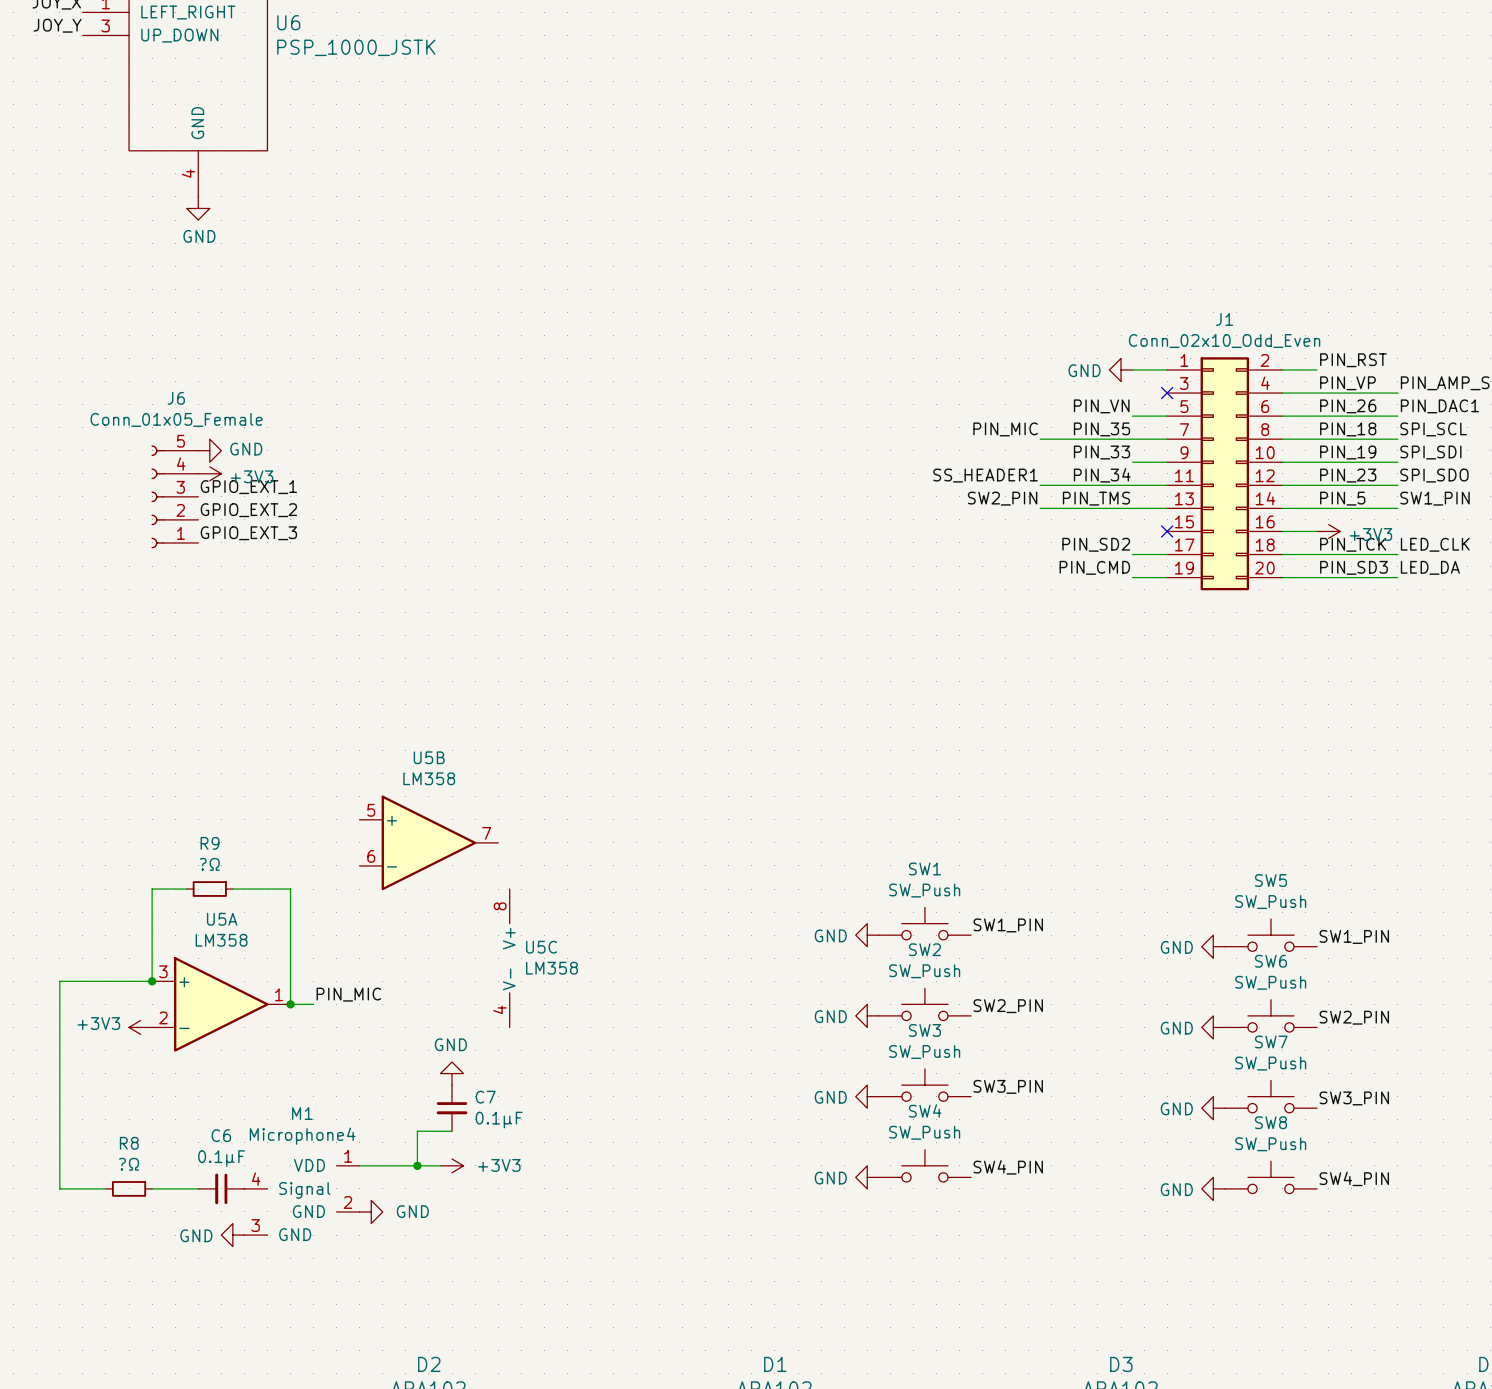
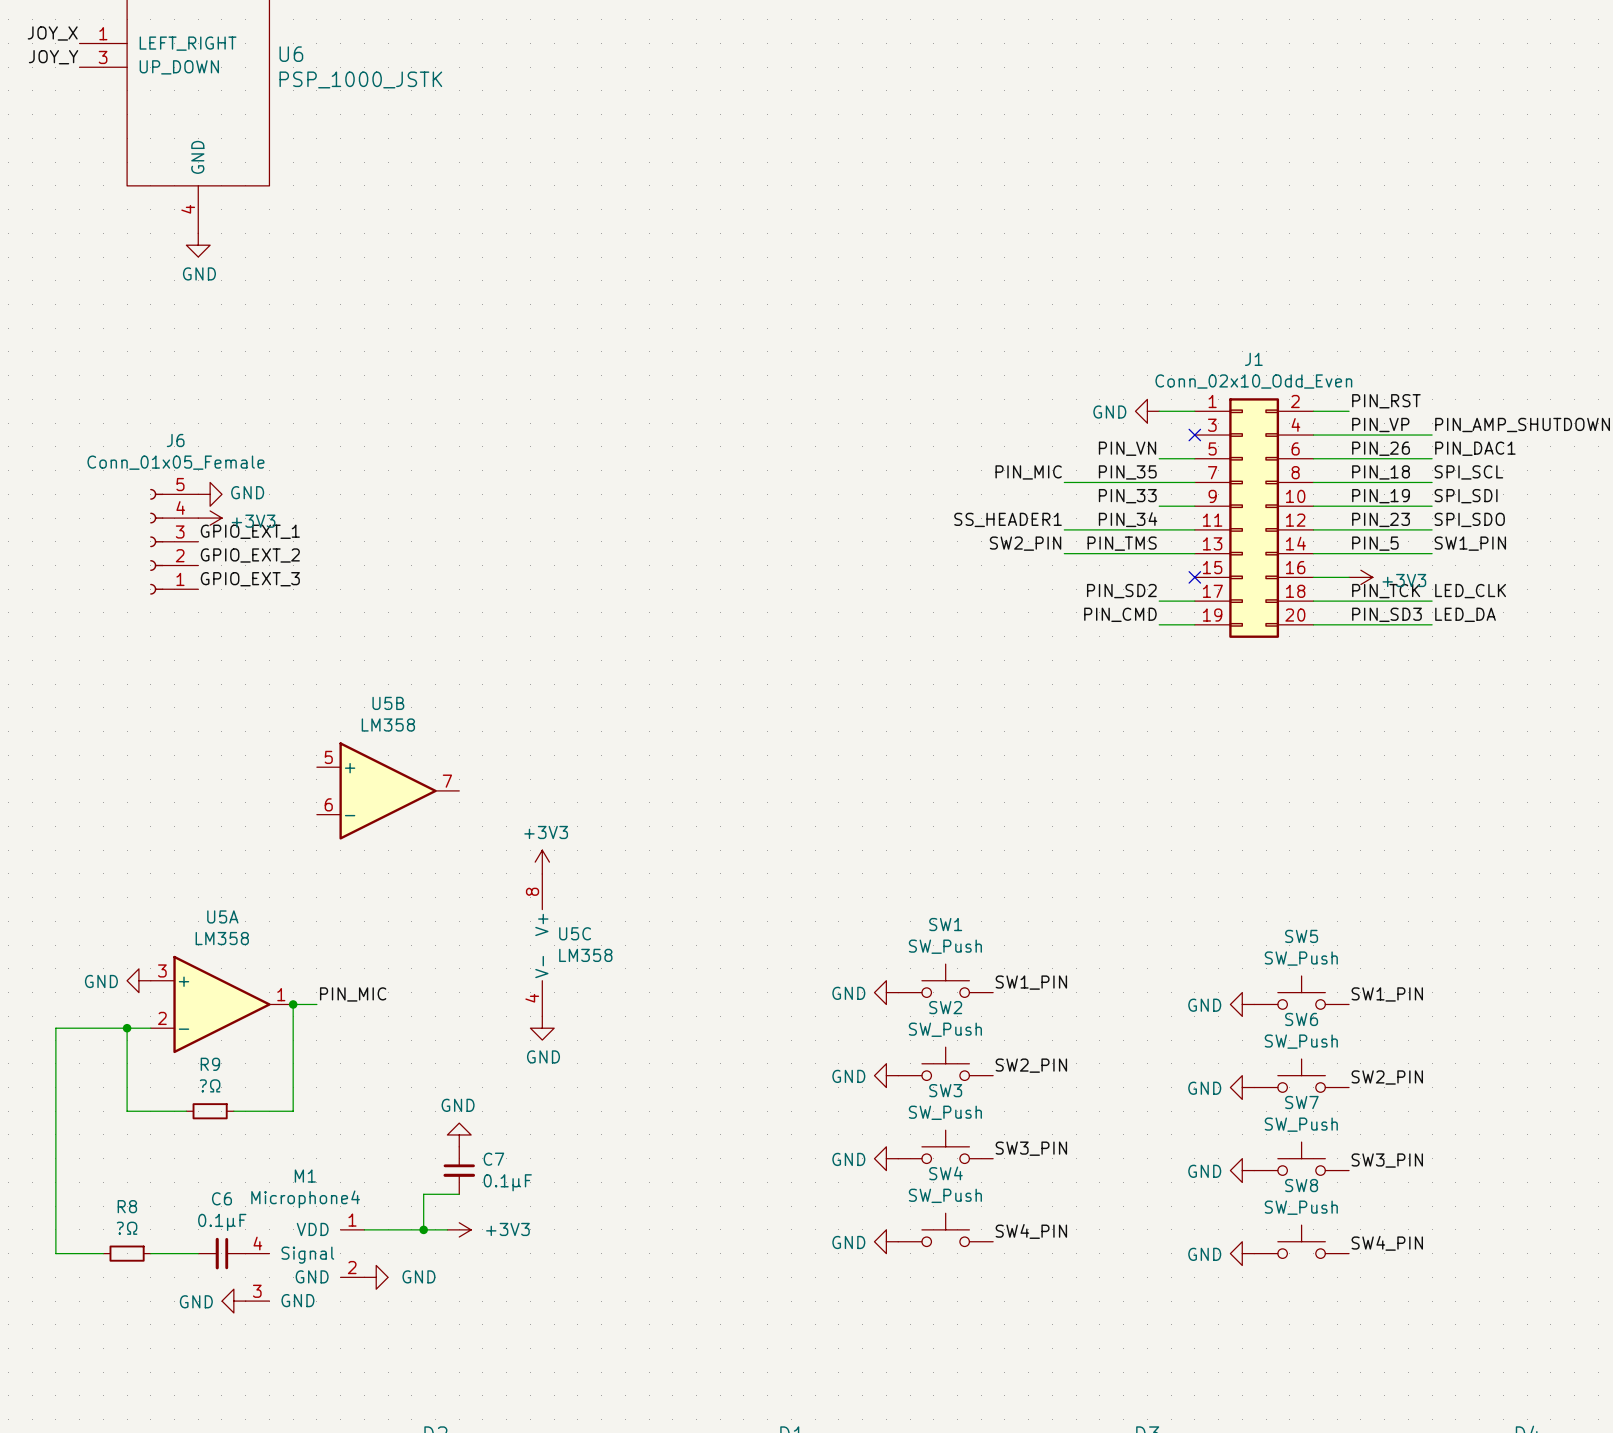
power symbol: none -> +3V3 (542, 862)
U5B position: (428, 842) -> (388, 790)
wire: (186, 889) (152, 889) (152, 981) (59, 981) -> (150, 1028) (55, 1028) (55, 1040)
R9 position: (209, 889) -> (210, 1111)
wire: (232, 889) (290, 889) (290, 946) -> (316, 1004) (293, 1004)
power symbol: none -> GND (138, 980)
junction: none -> (293, 1004)
U5C position: (509, 958) -> (542, 945)
wire: none -> (127, 1028) (127, 1111) (186, 1111)
power symbol: none -> GND (542, 1028)
junction position: (152, 981) -> (127, 1028)
label position: PIN_MIC (348, 994) -> PIN_MIC (353, 994)
U5A position: (221, 1004) -> (221, 1004)
wire: (290, 1004) (313, 1004) -> (293, 1063) (293, 1111) (233, 1111)
junction: (290, 1004) -> none
power symbol: +3V3 (140, 1027) -> none

